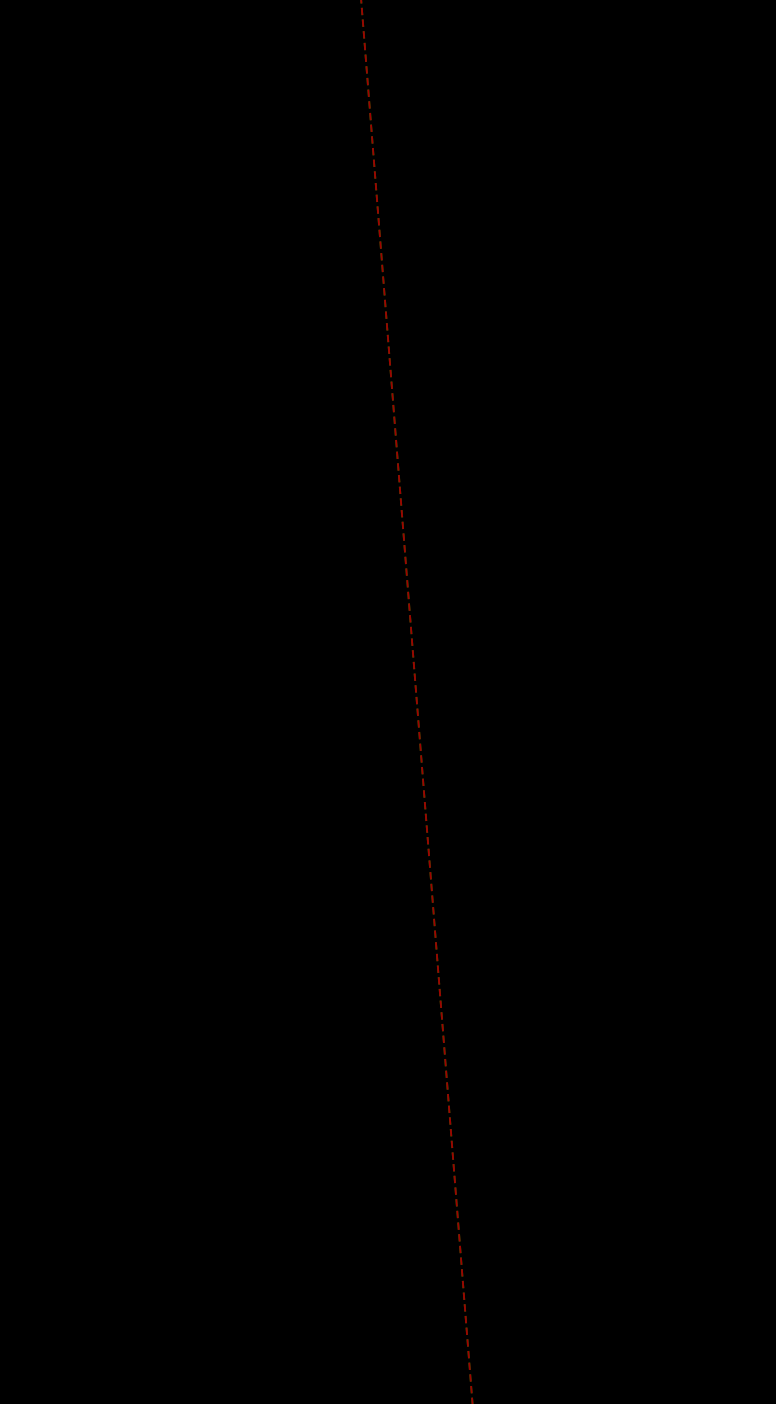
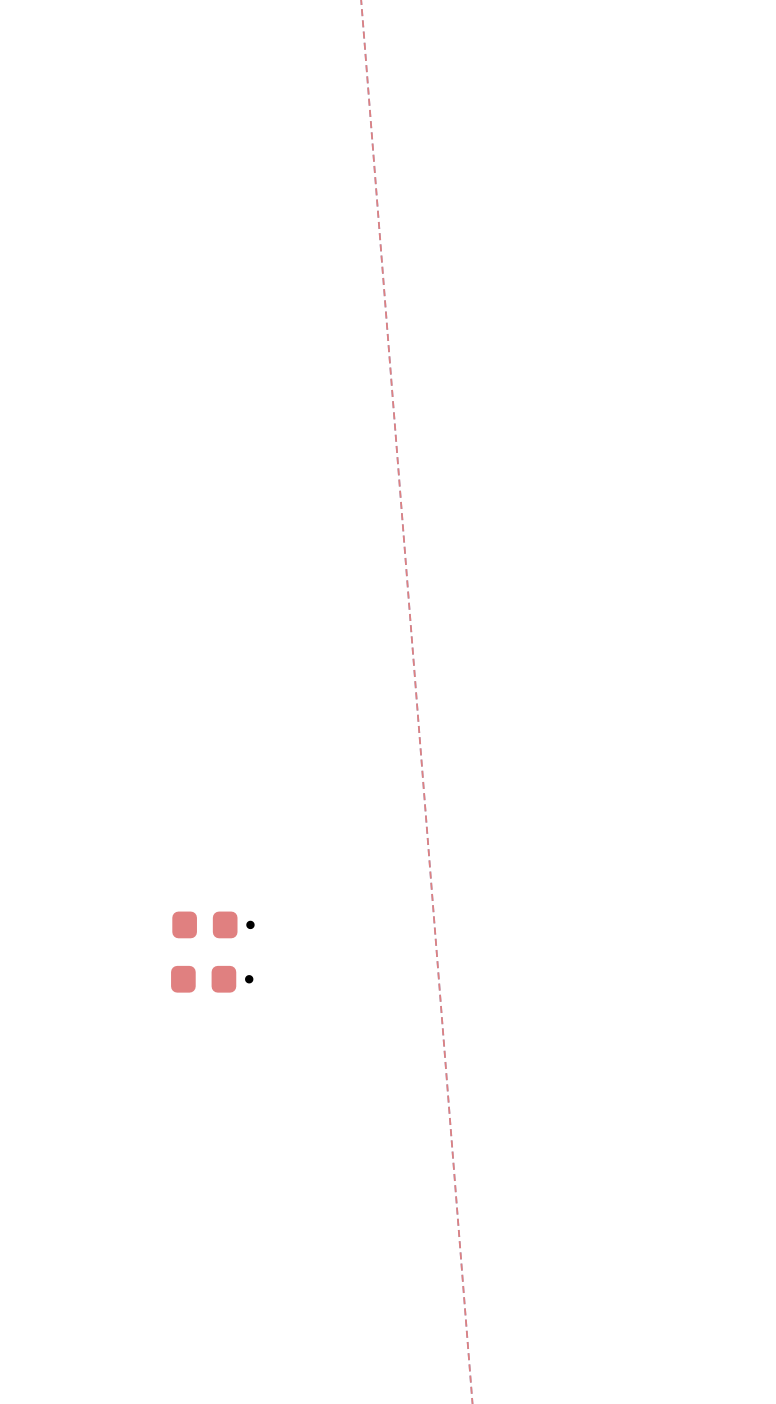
part: none -> (213, 924)
part: none -> (212, 979)

